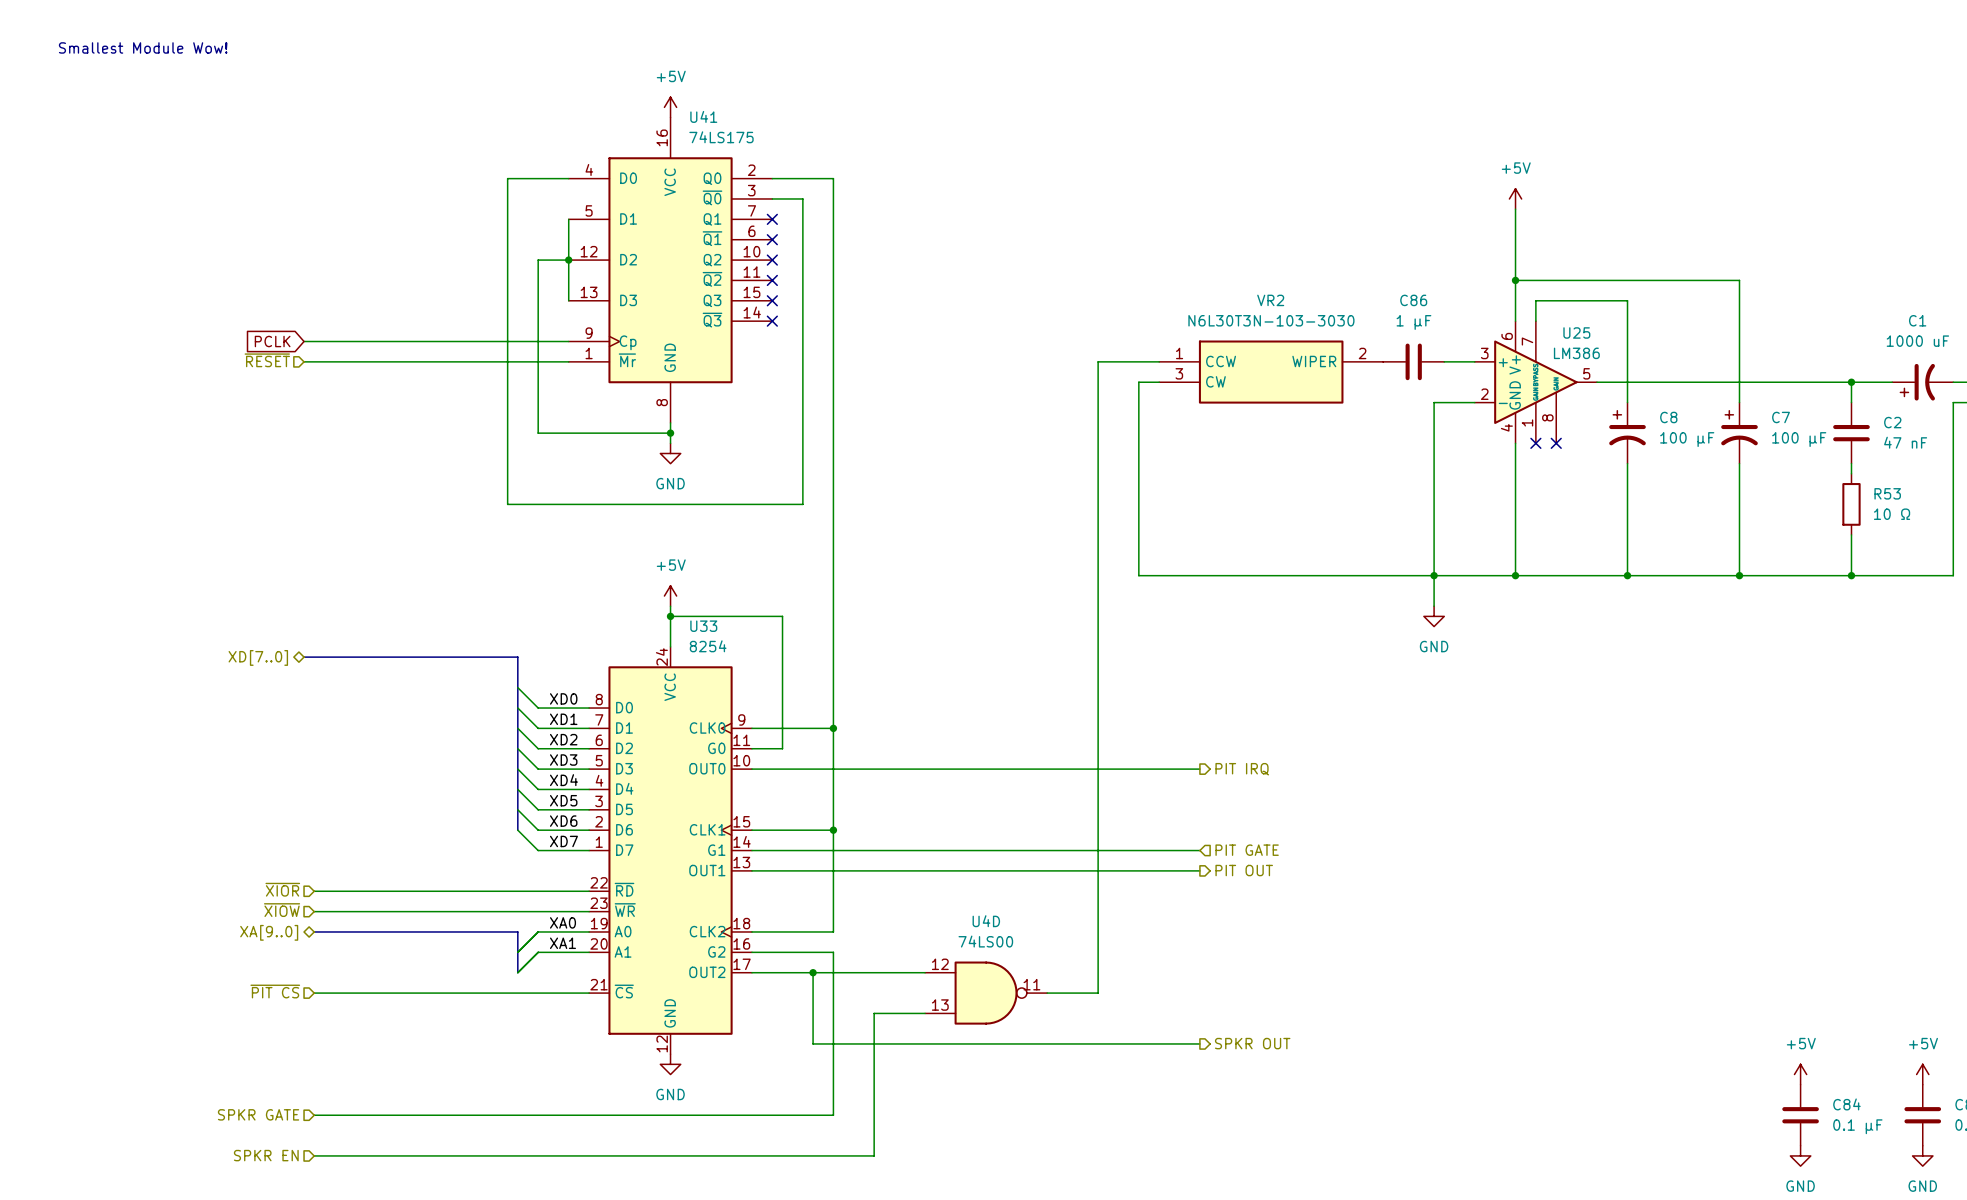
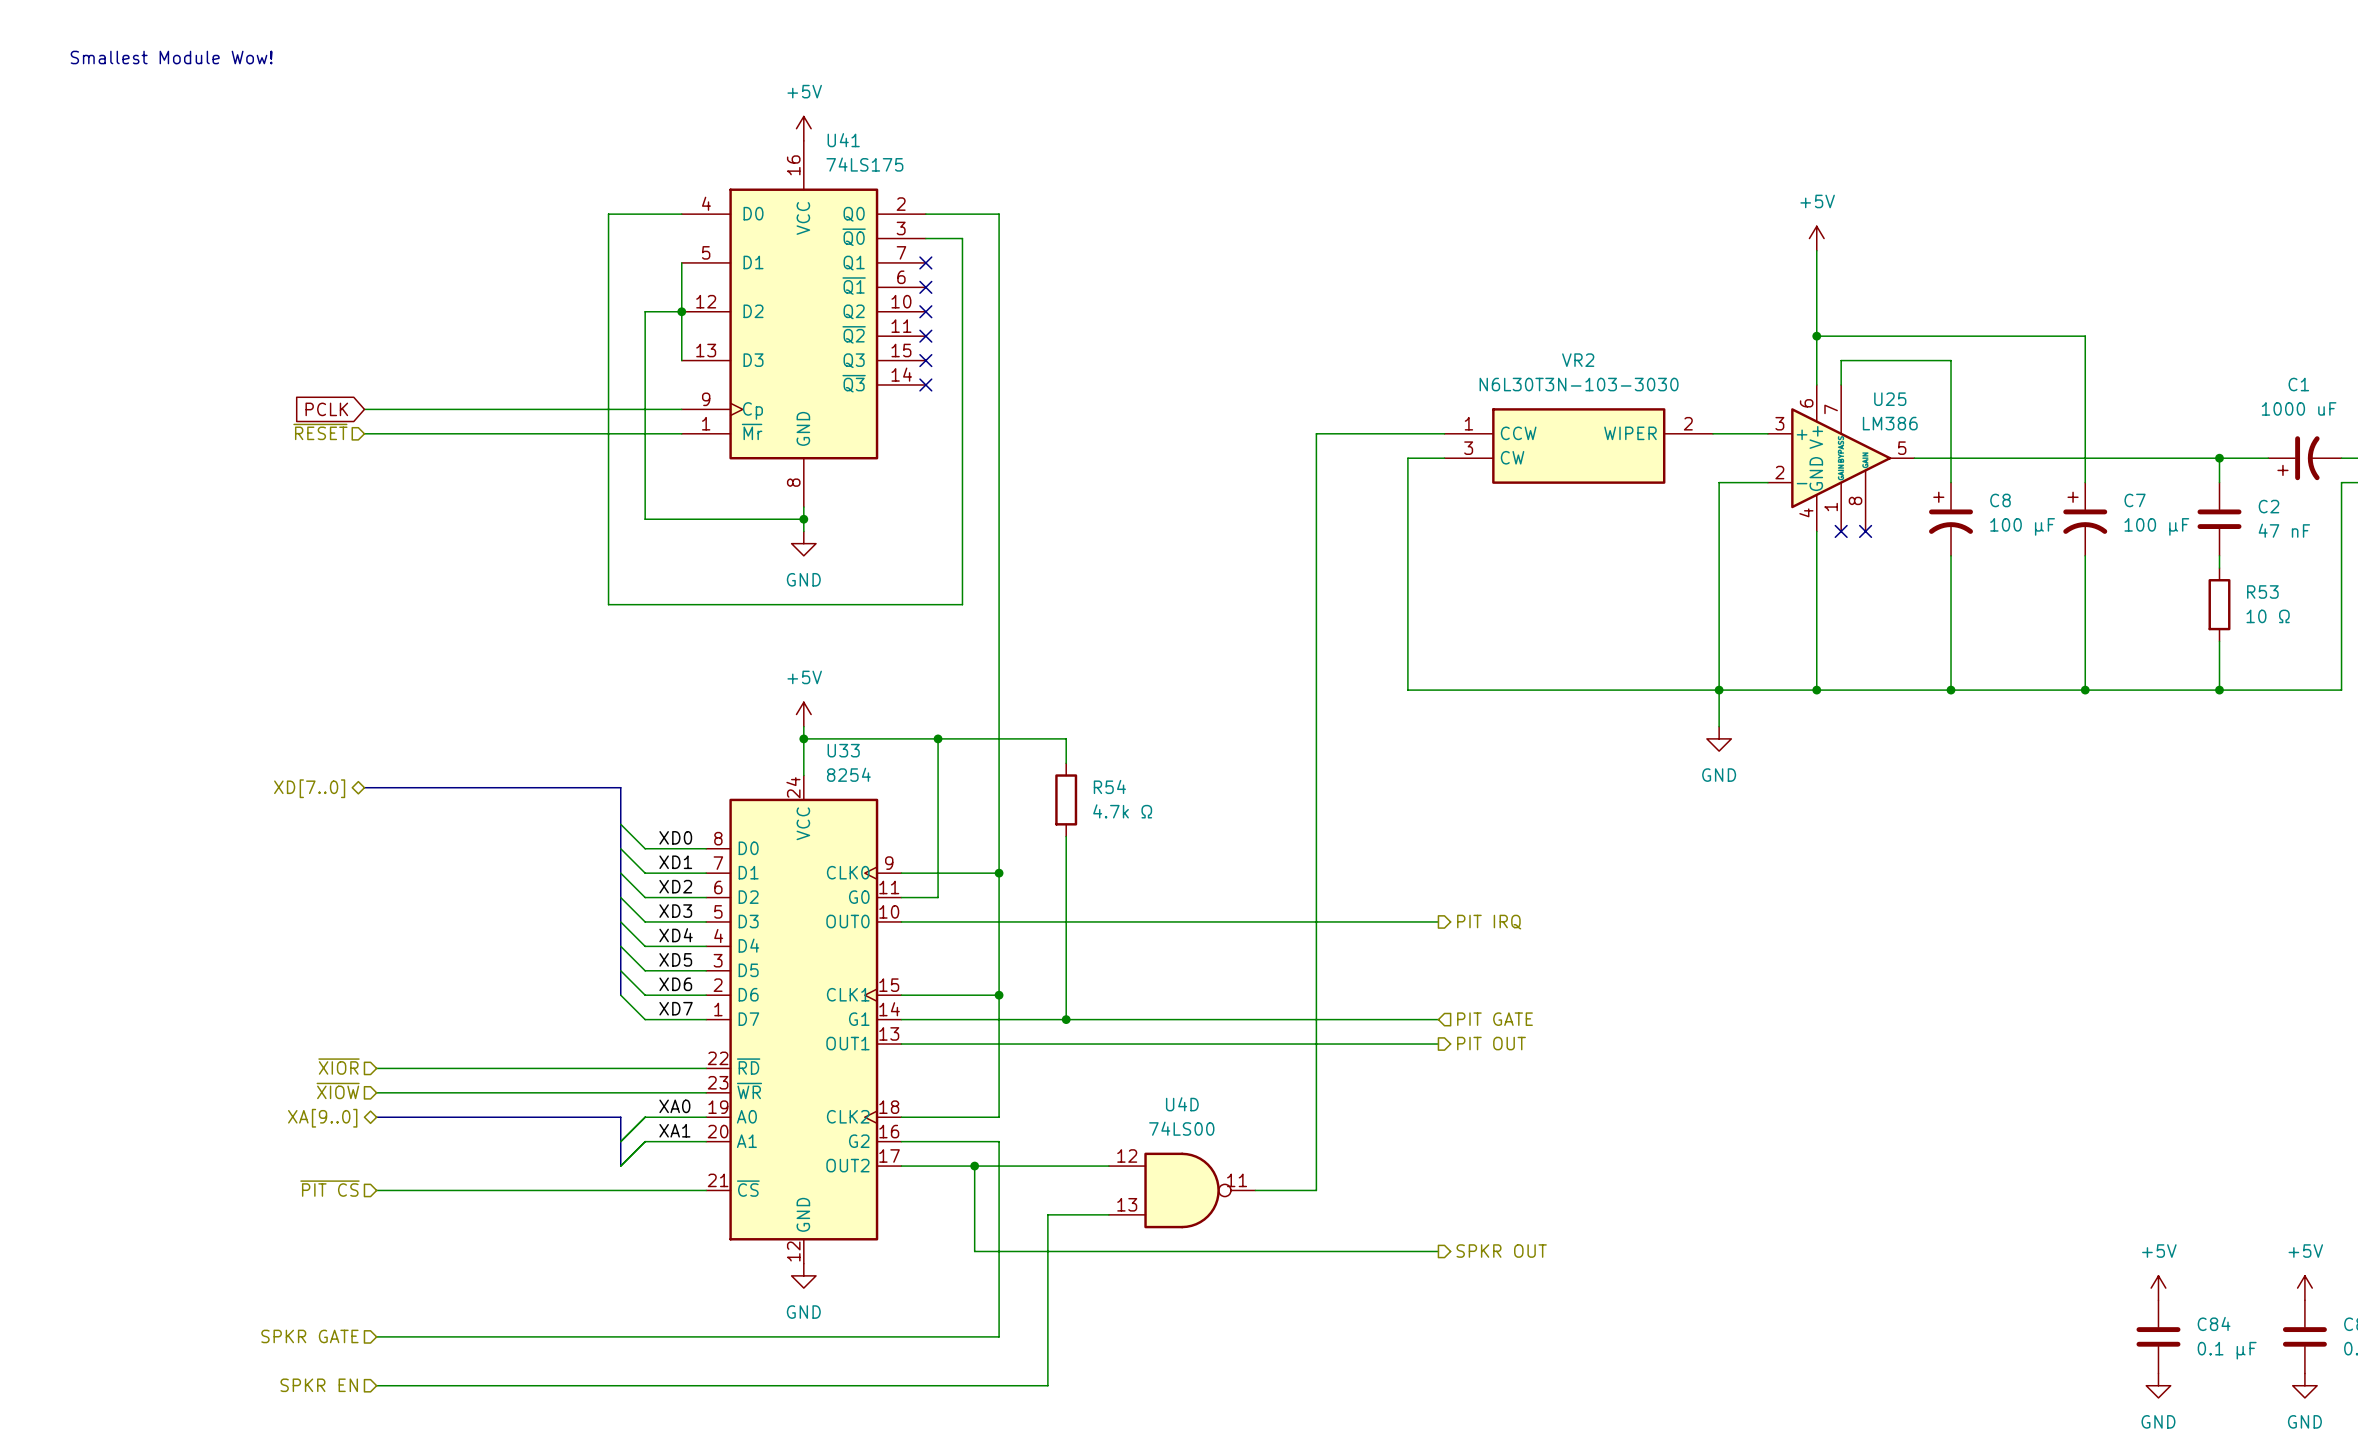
C86: 1 μF (1413, 361) -> none
VR2 position: (1271, 372) -> (1578, 446)
wire: (1159, 382) (1138, 382) (1138, 575) (1174, 575) -> (1444, 458) (1407, 458) (1407, 690)
wire: none -> (938, 738) (1066, 738) (1066, 763)
junction: none -> (938, 738)
R54: none -> 4.7k Ω (1066, 799)
wire: none -> (1066, 836) (1066, 1019)
junction: none -> (1066, 1019)

